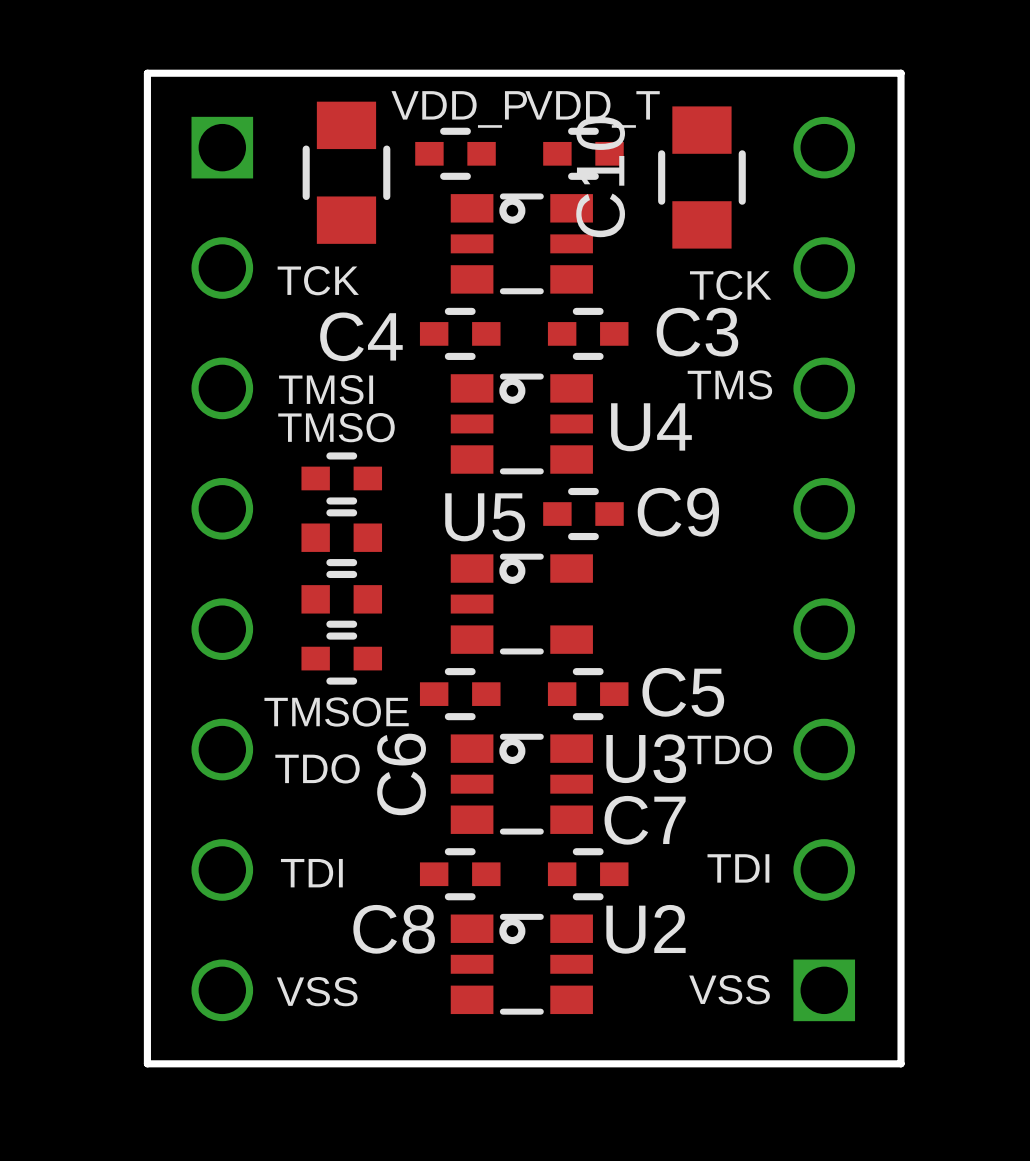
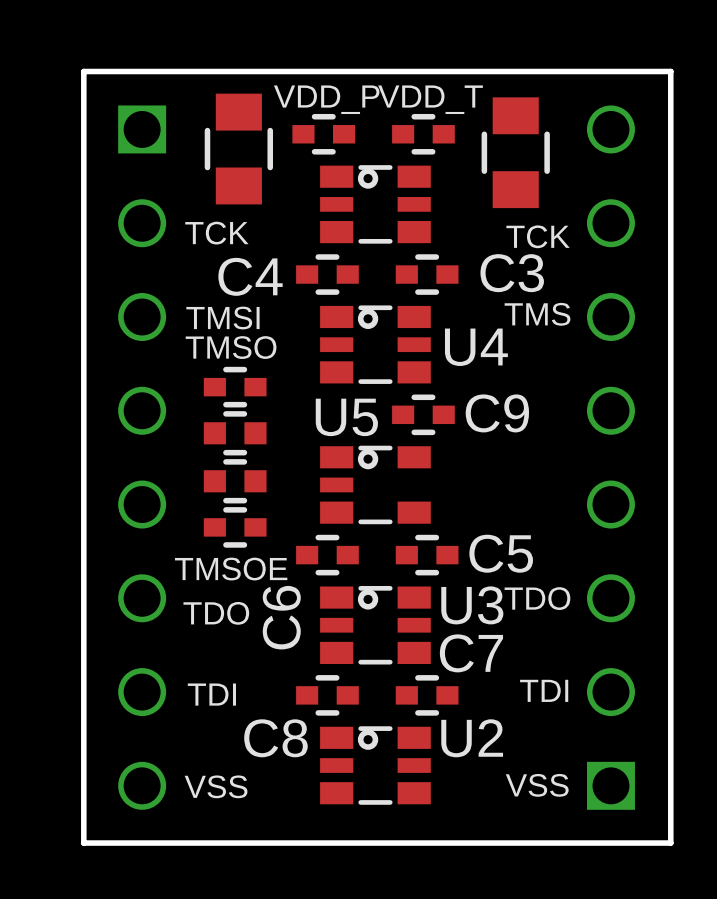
C10 name: C10 (600, 177) -> none

